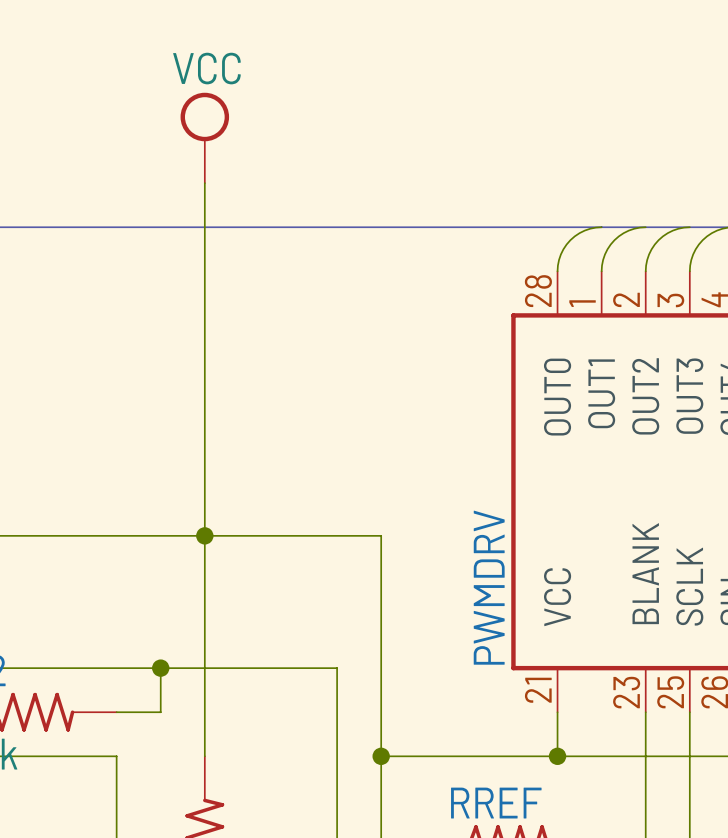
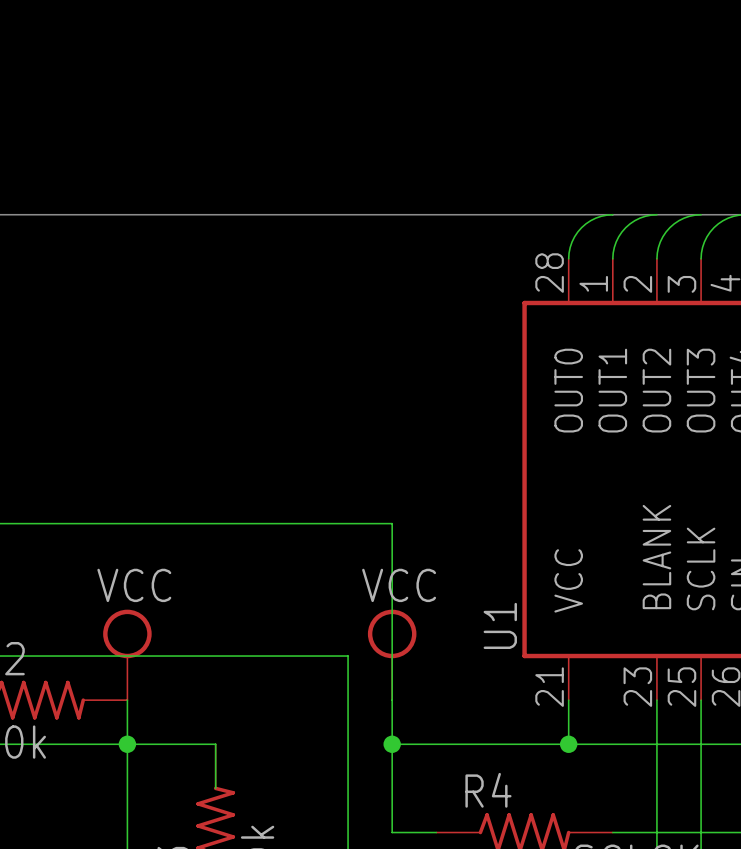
power symbol: VCC (204, 137) -> none
wire: (204, 183) (204, 756) -> none
junction: (204, 535) -> none
PWMDRV name: PWMDRV (489, 587) -> U1 (500, 625)
power symbol: none -> VCC (127, 654)
power symbol: none -> VCC (392, 654)
wire: (160, 668) (160, 712) (116, 712) -> (215, 788) (215, 744) (127, 744) (127, 700)
junction position: (160, 668) -> (127, 744)
RREF name: RREF (496, 803) -> R4 (488, 790)

